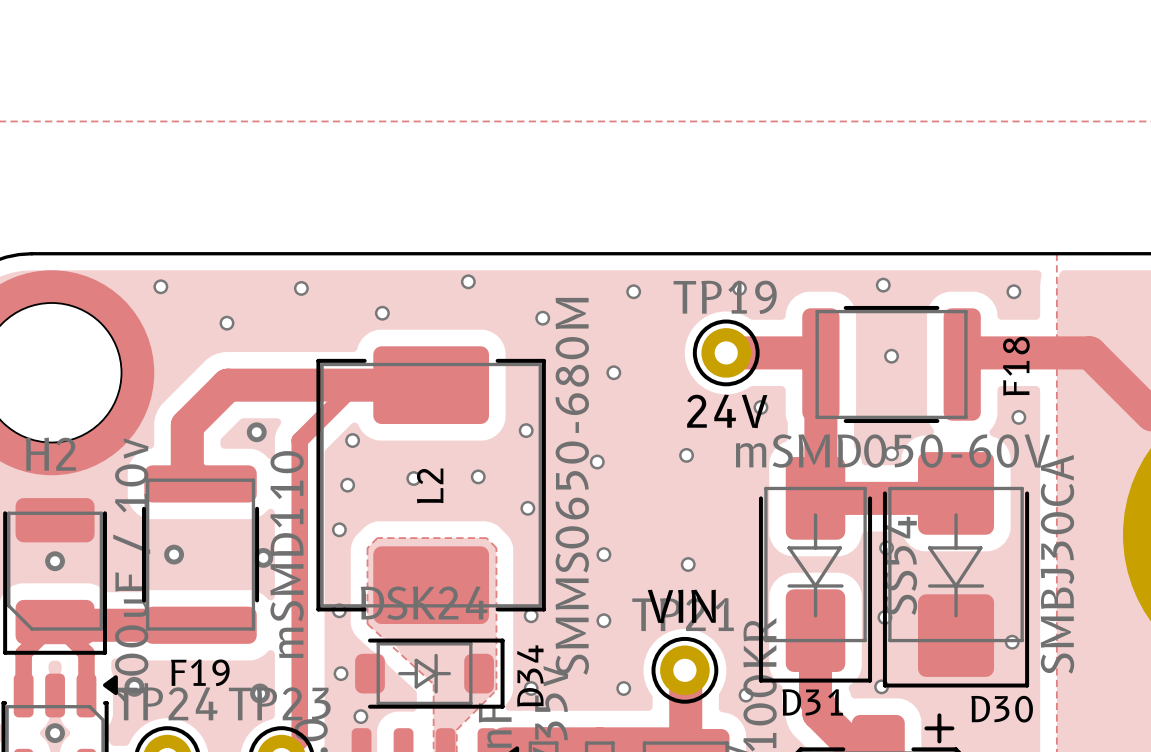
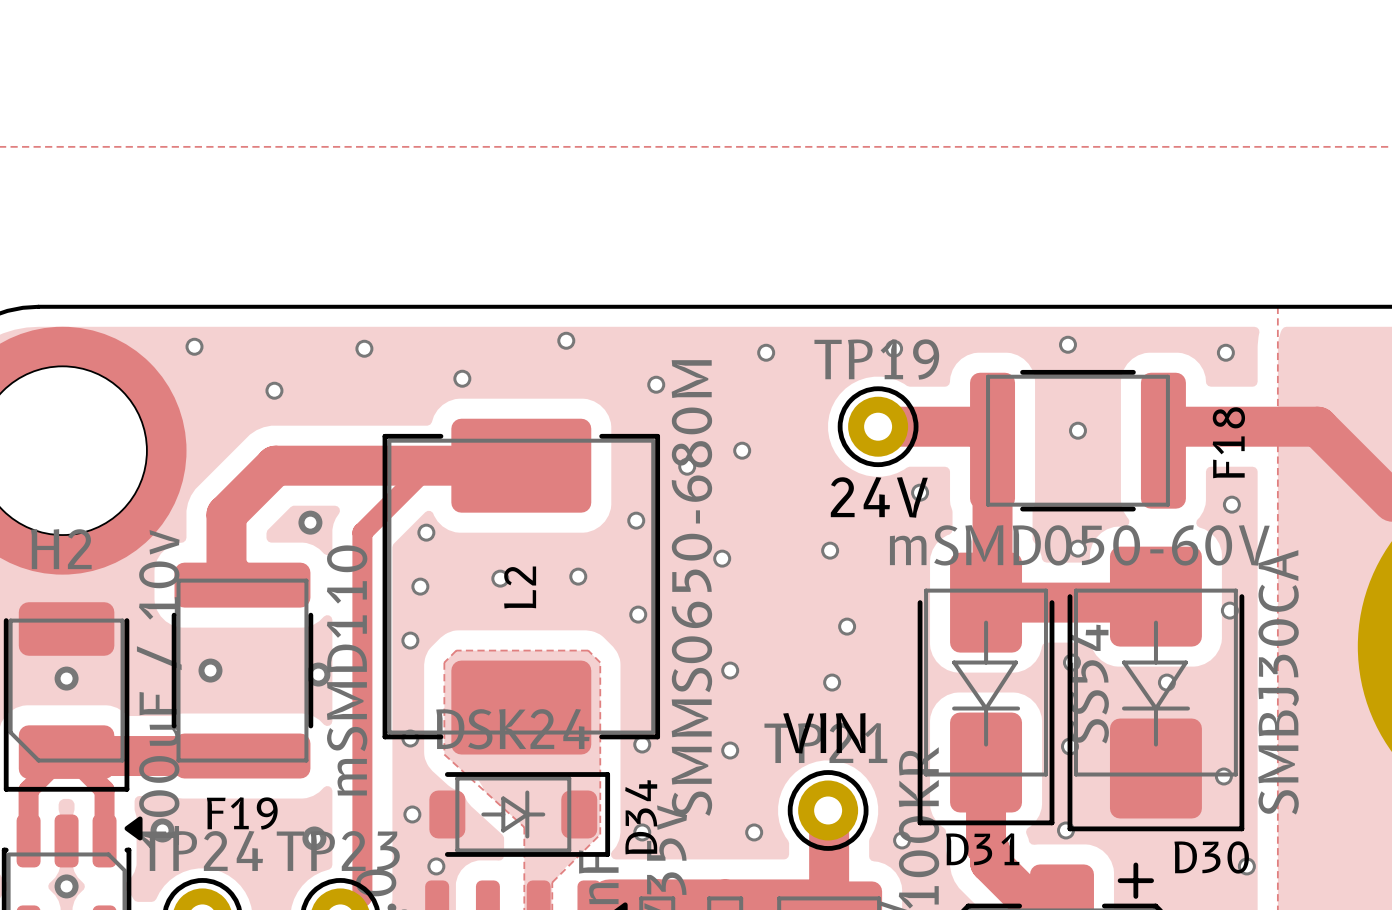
via: none -> (687, 466)
via: none -> (1229, 610)
via: none -> (847, 626)
via: none -> (1166, 682)
via: none -> (1246, 866)

